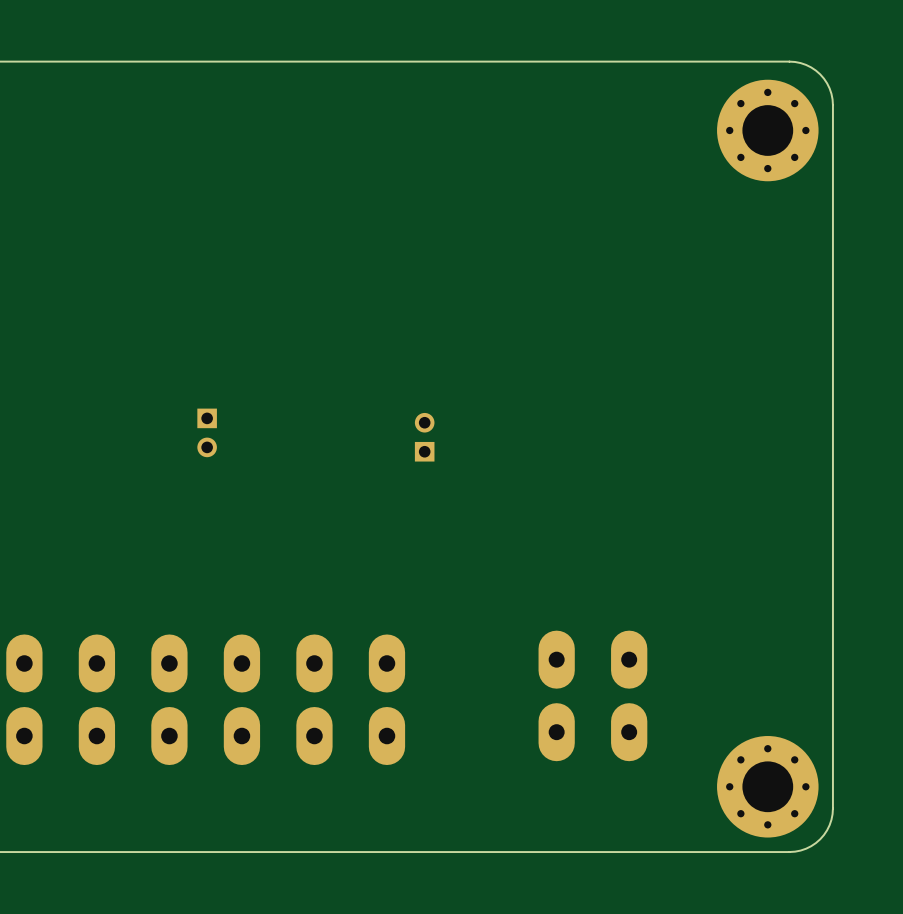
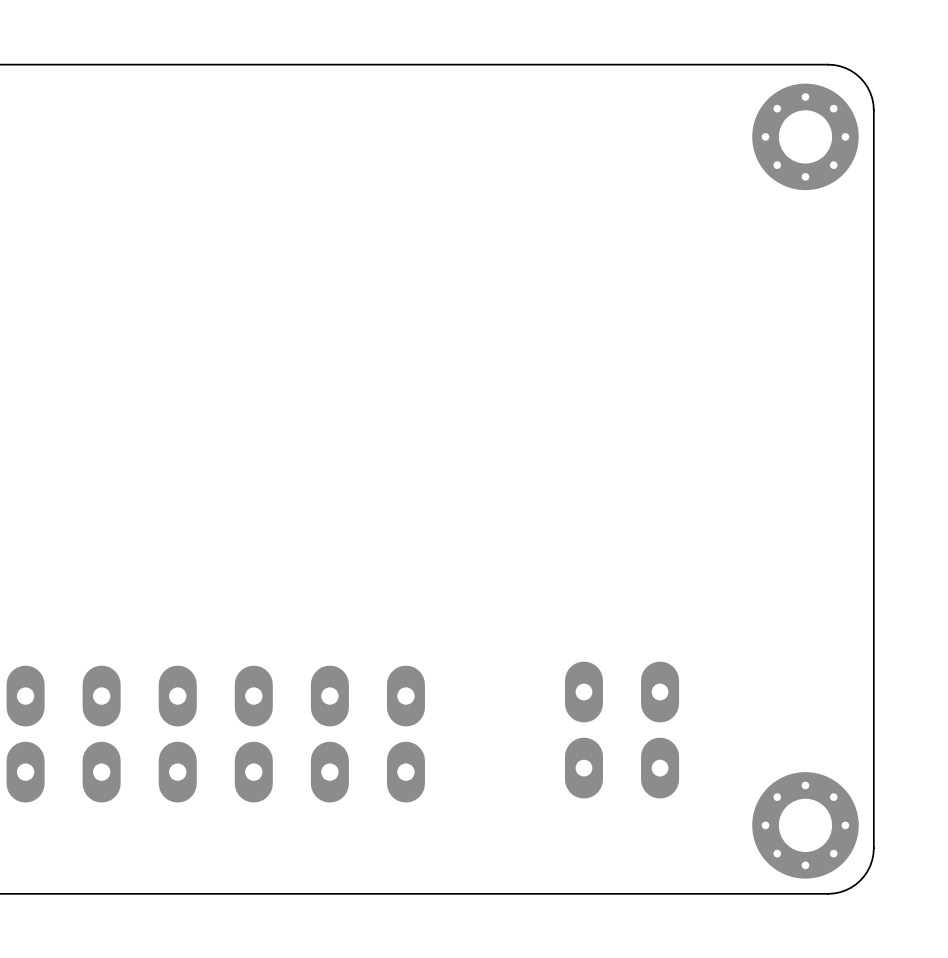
part: (207, 432) -> none
part: (424, 437) -> none

